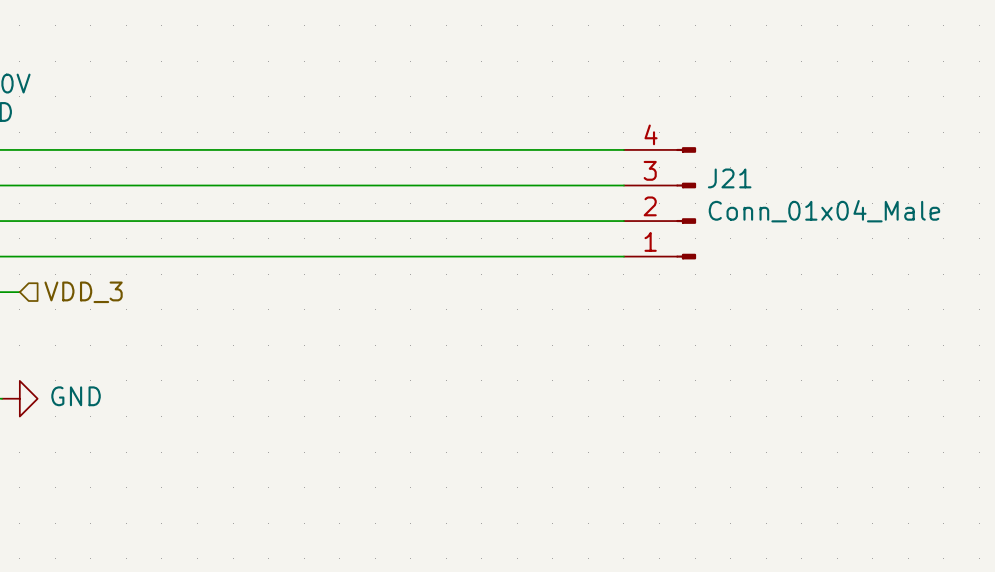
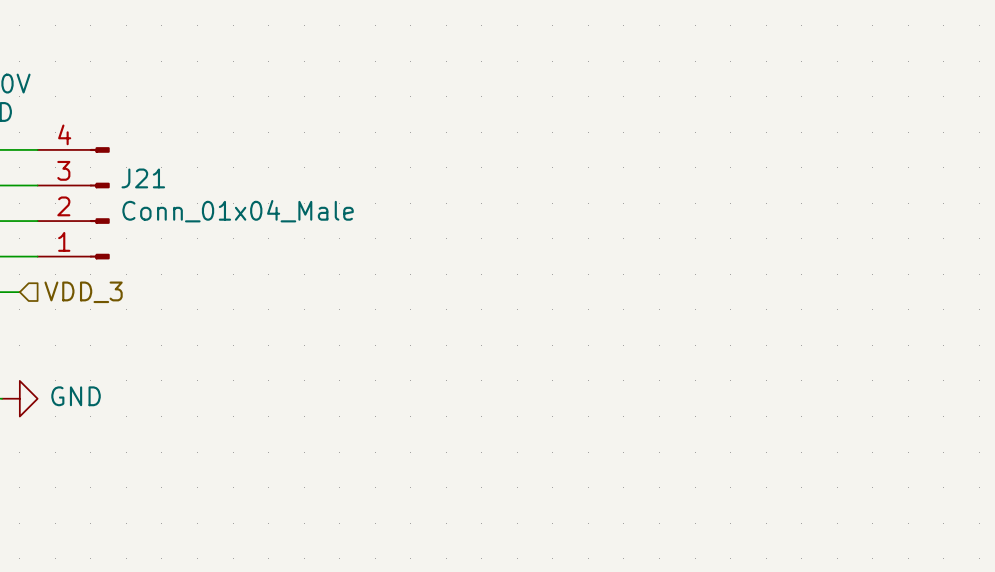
wire: (37, 149) (623, 149) -> none
wire: (37, 185) (623, 185) -> none
J21 position: (660, 203) -> (73, 203)
wire: (37, 221) (623, 221) -> none
wire: (37, 256) (623, 256) -> none

